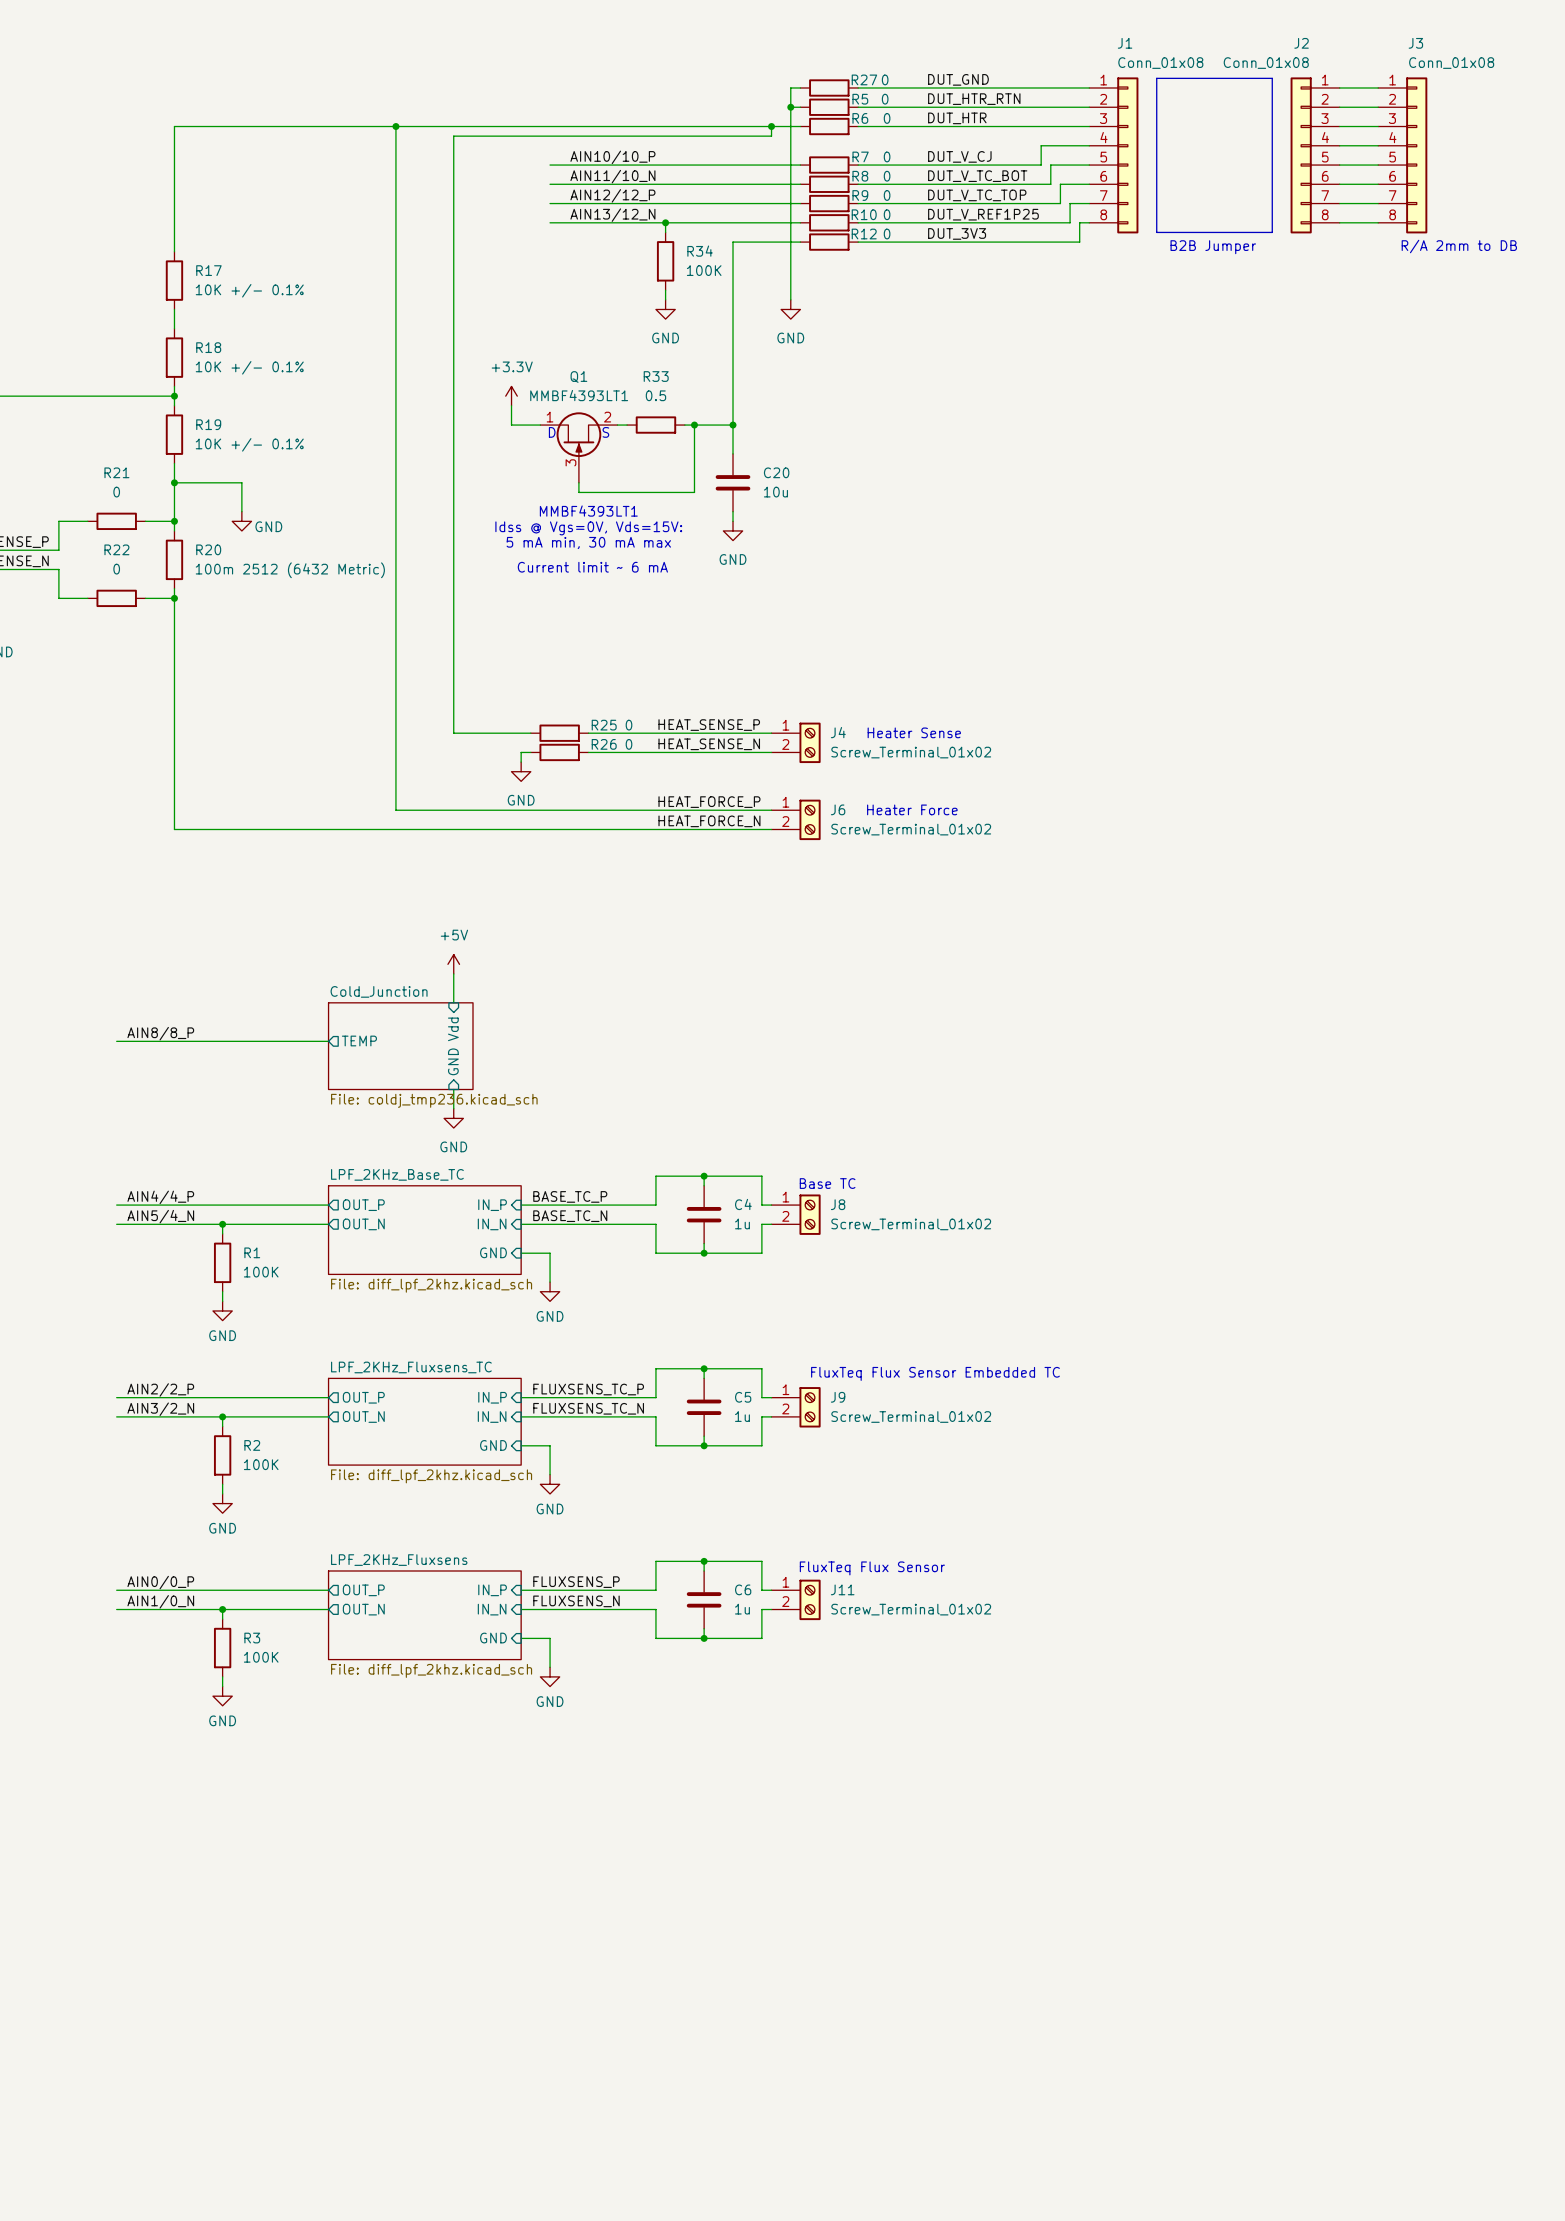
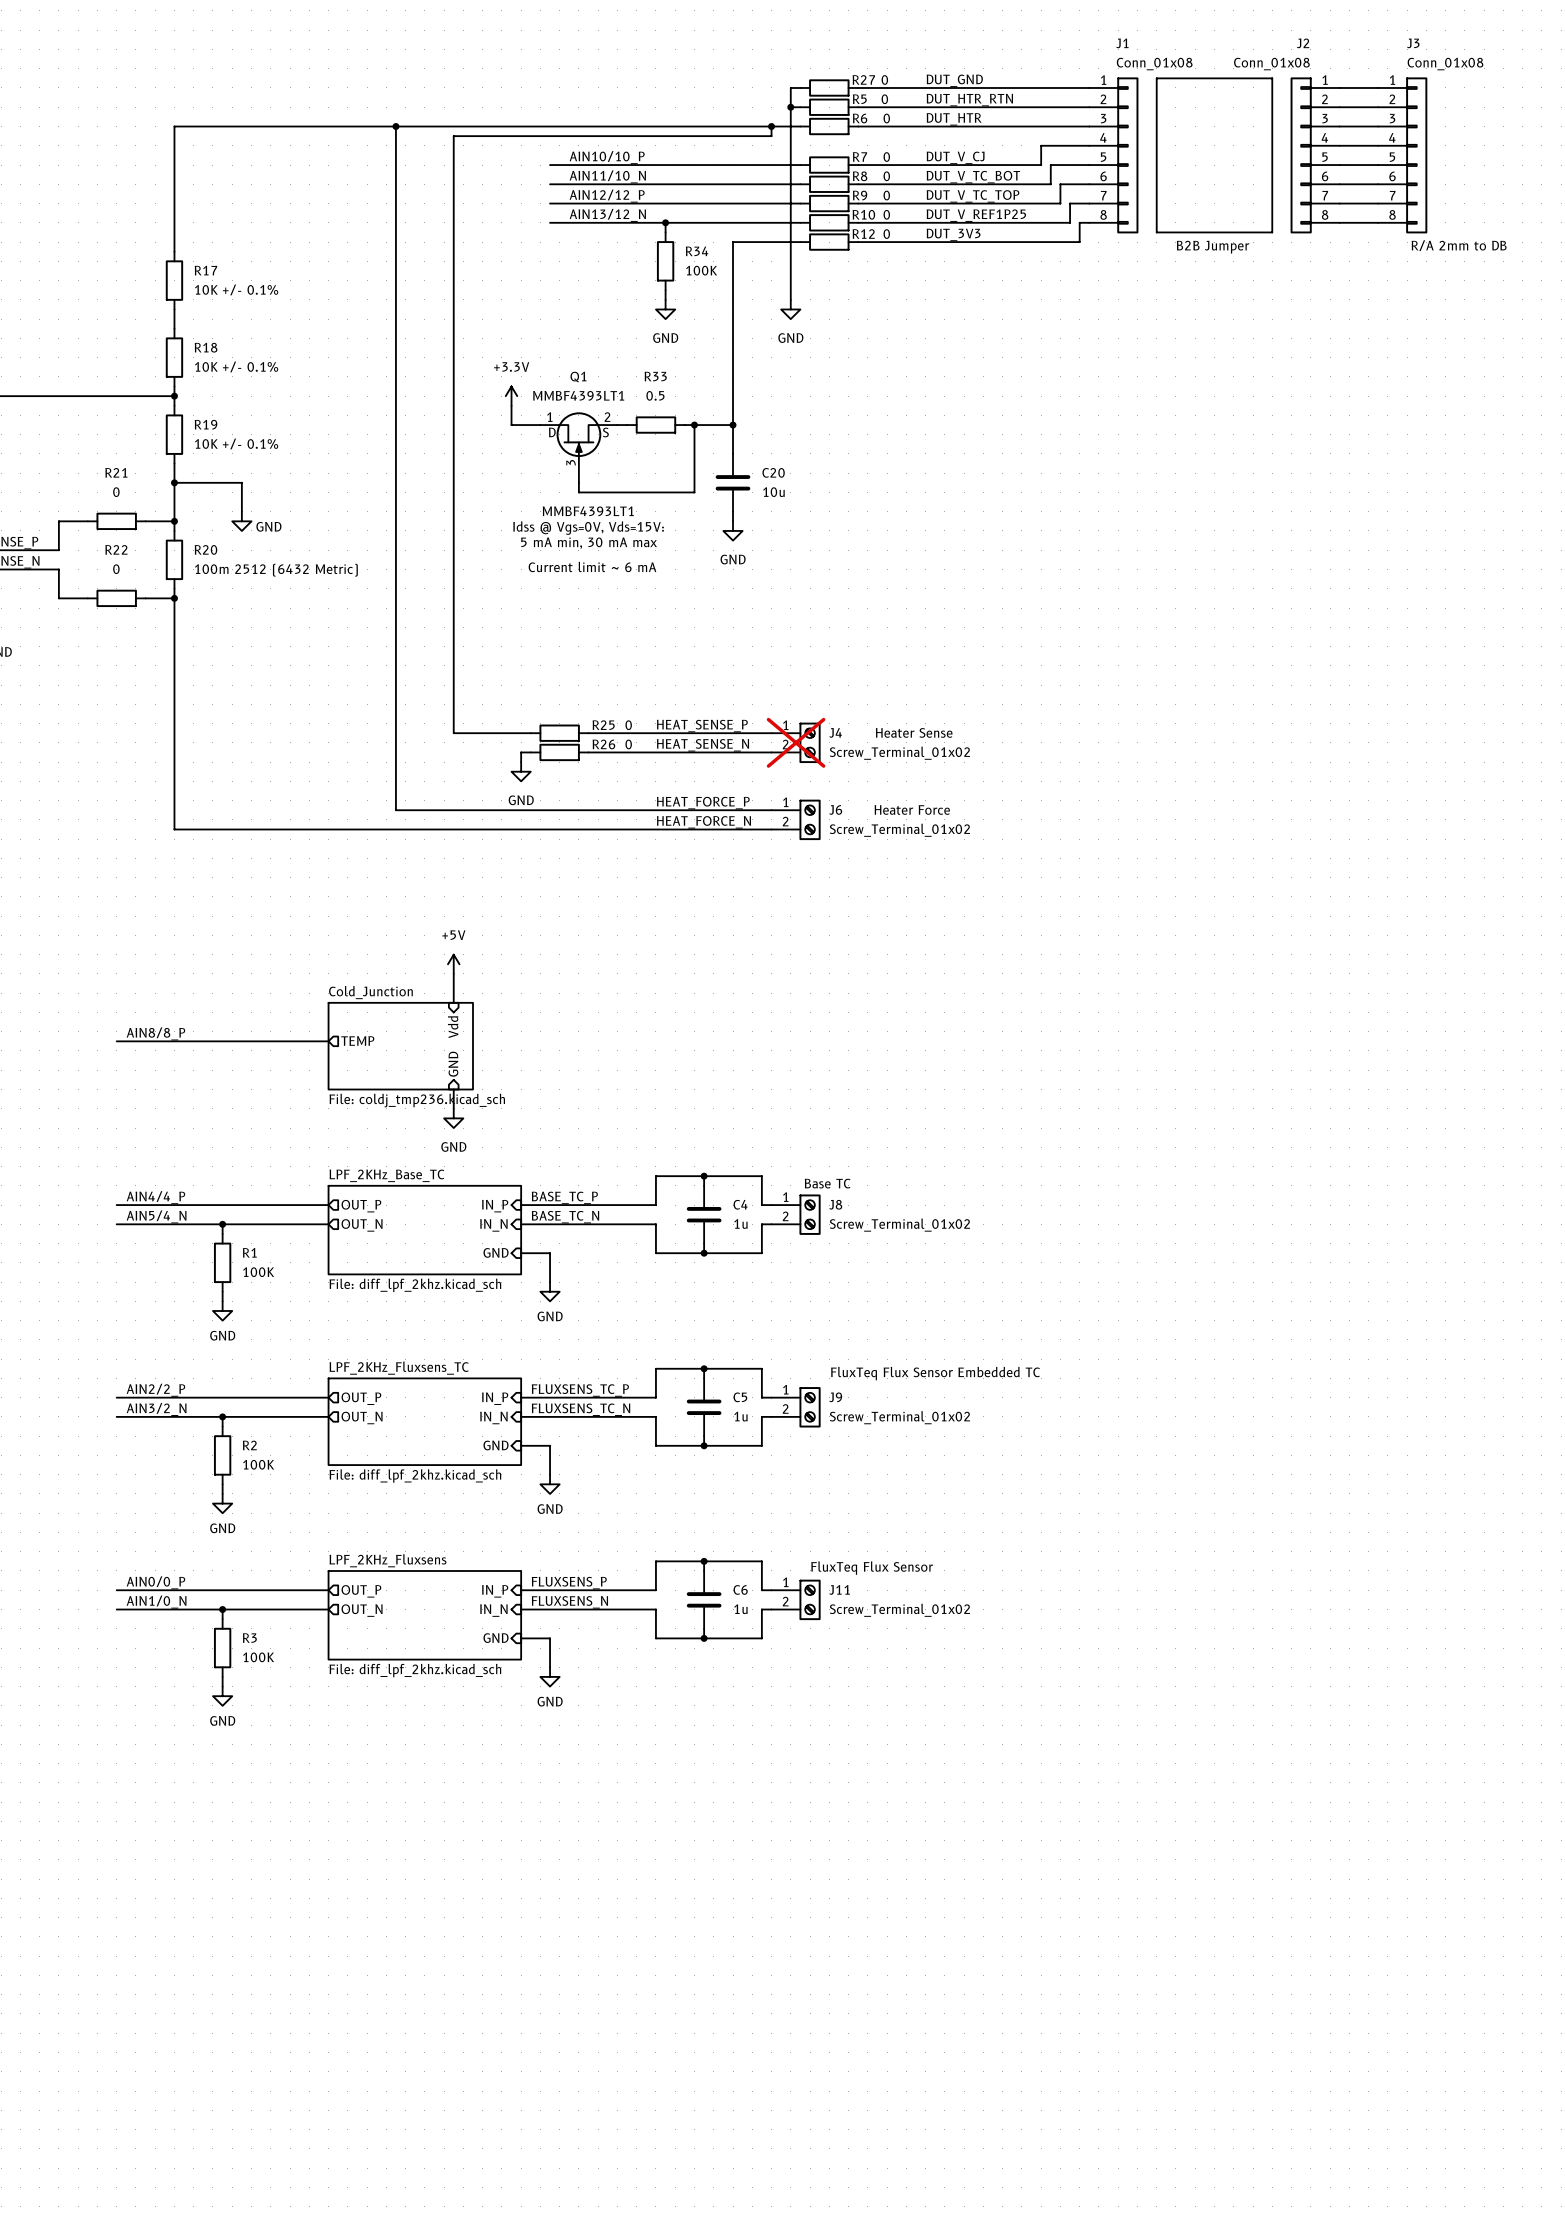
J4 do-not-place cross: none -> (796, 742)

